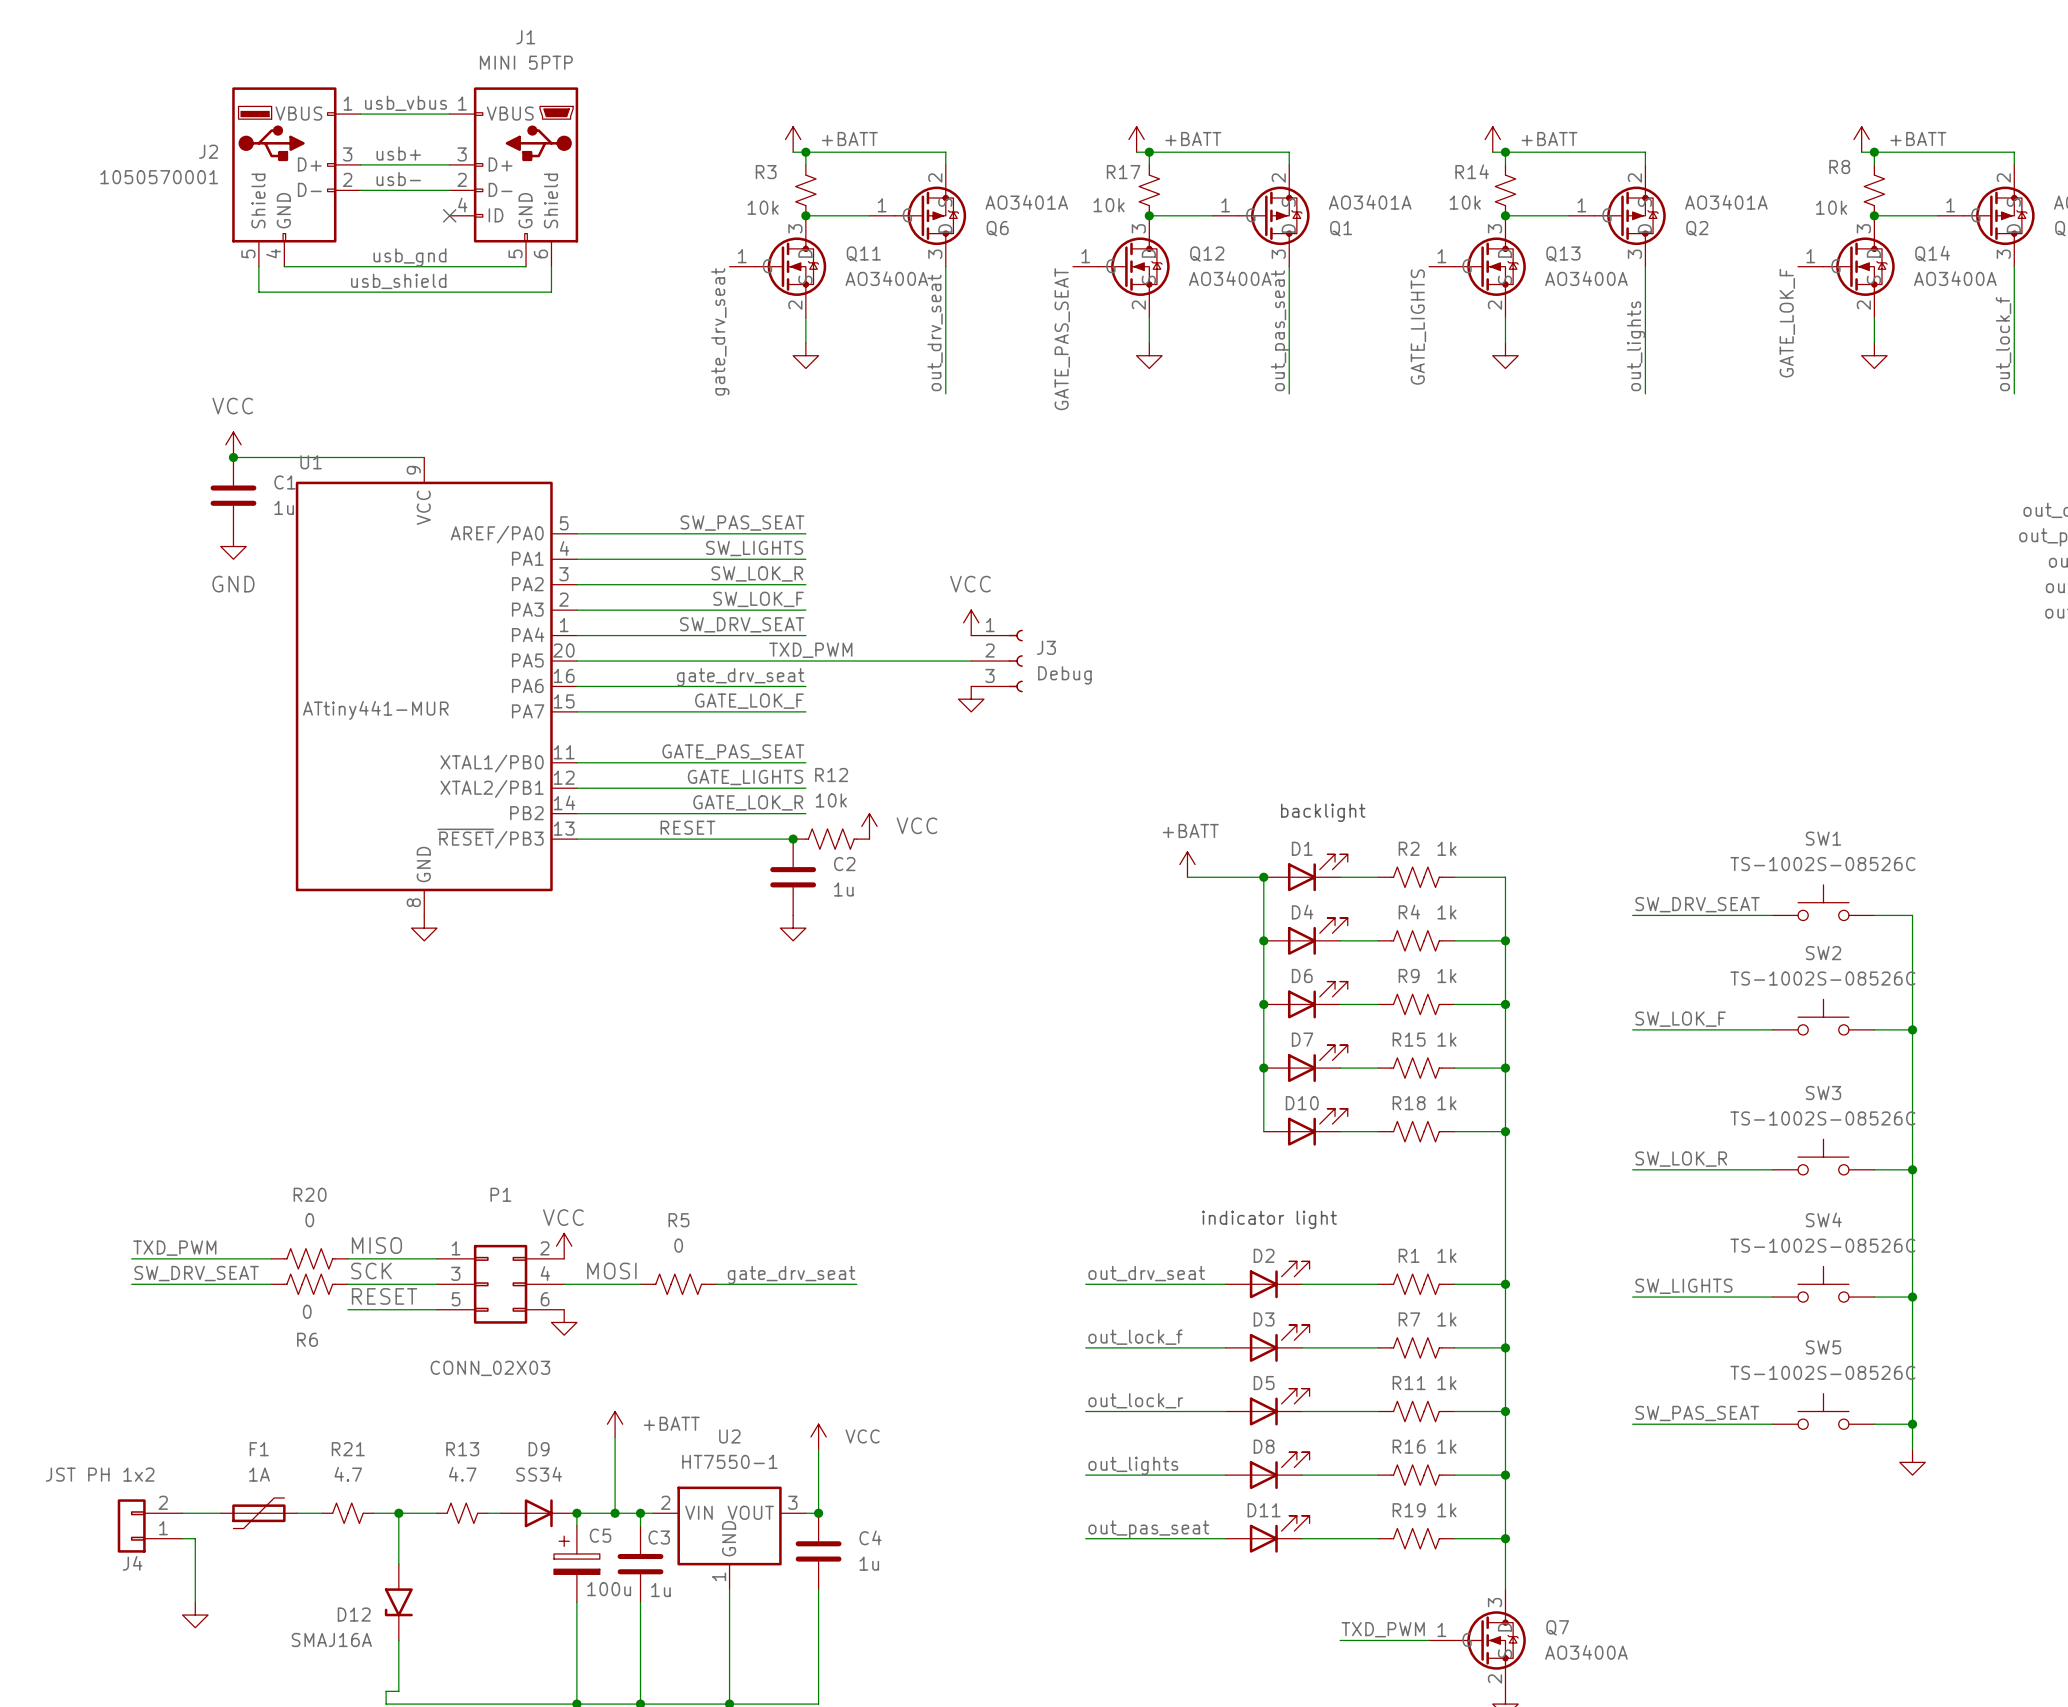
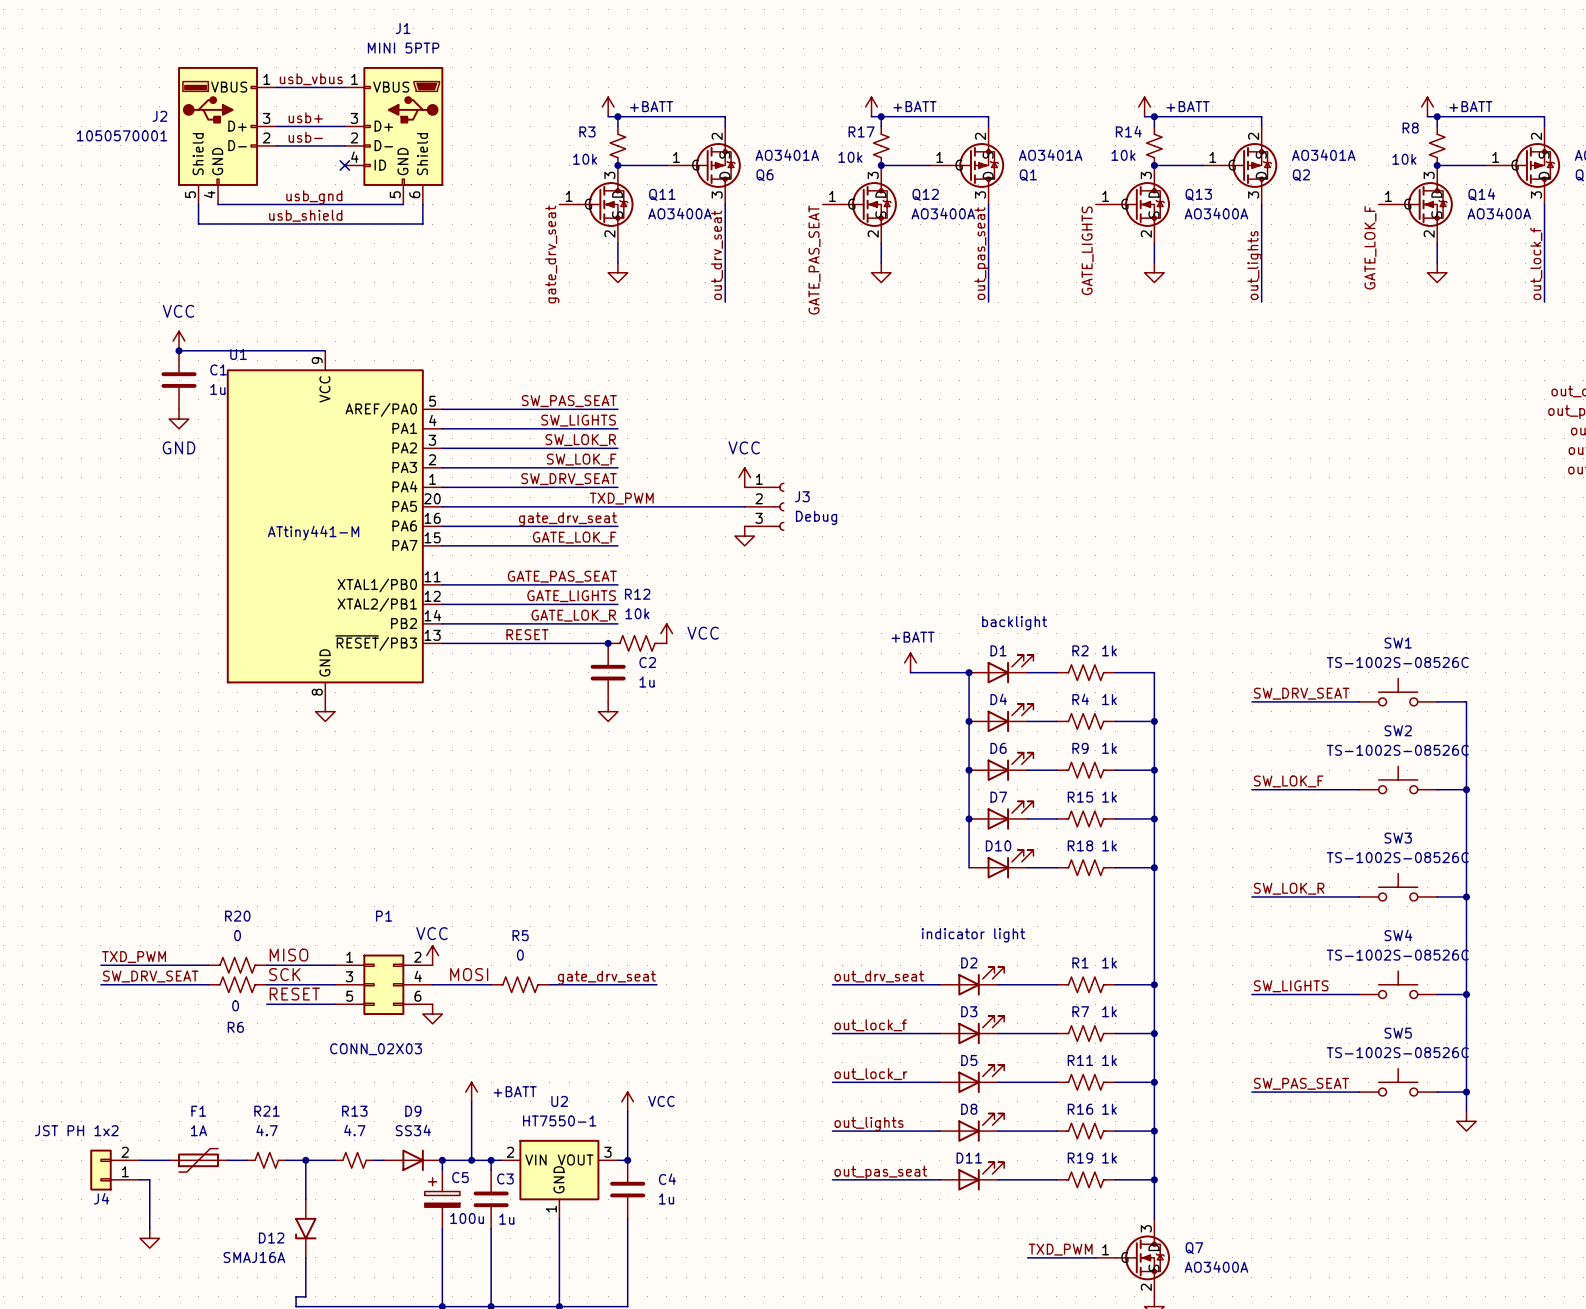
U1 value: ATtiny441-MUR (375, 710) -> ATtiny441-M (313, 533)

